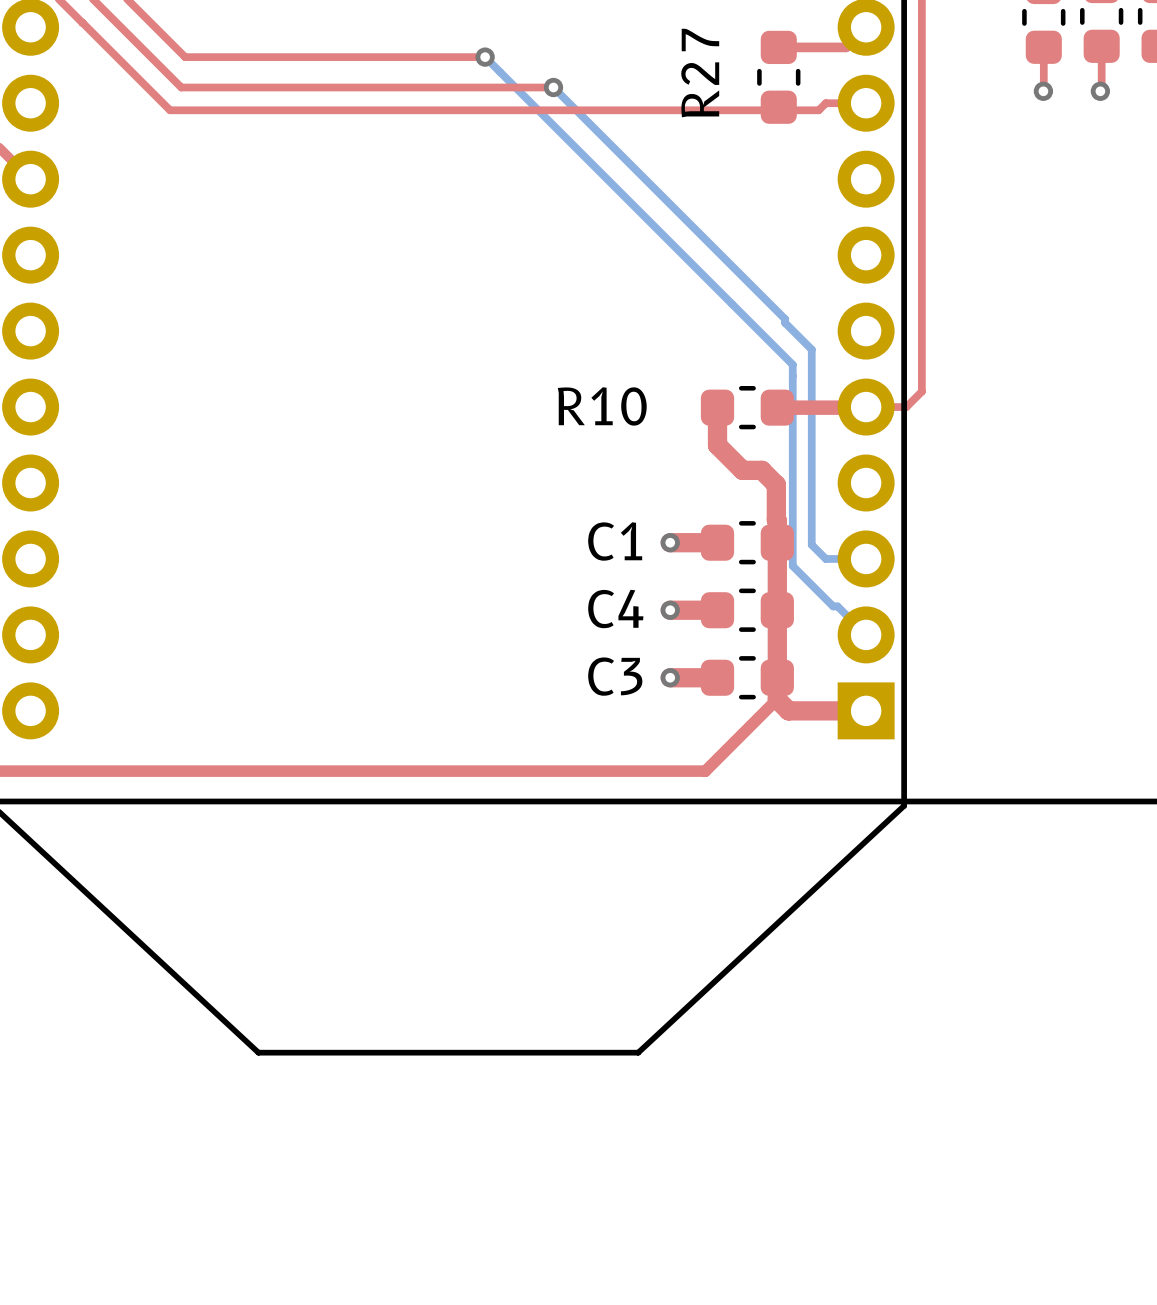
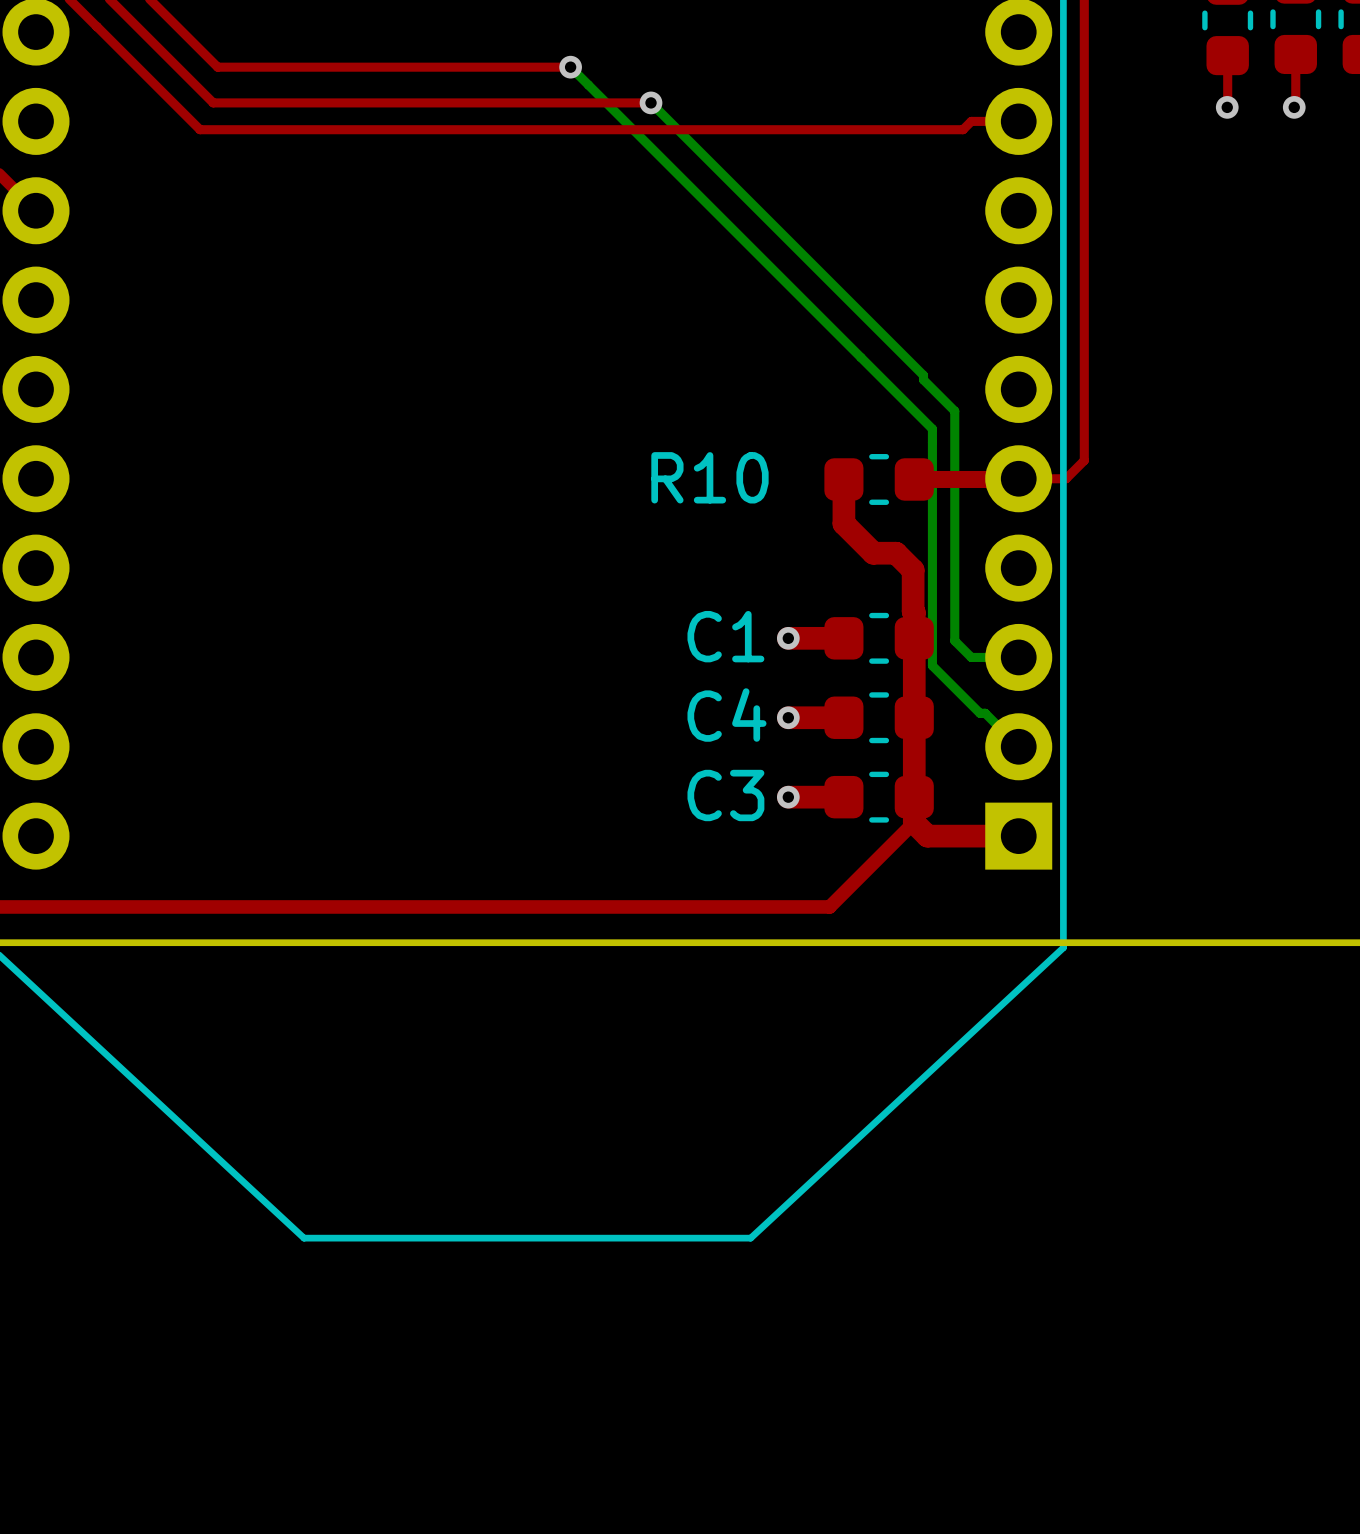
top track: (866, 27) (845, 47) (778, 47) -> none
R27: (778, 77) -> none

